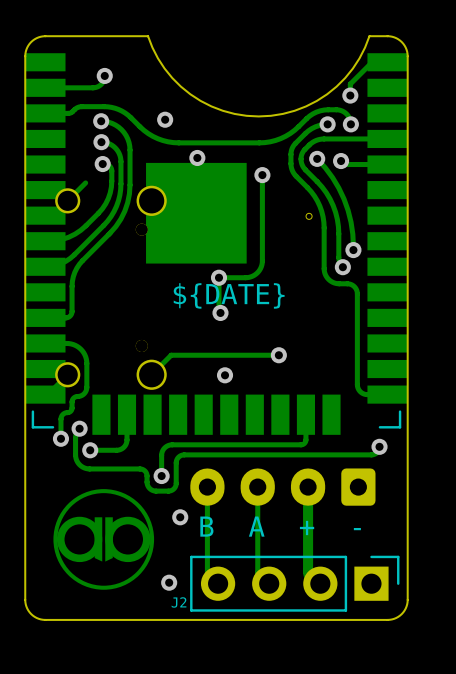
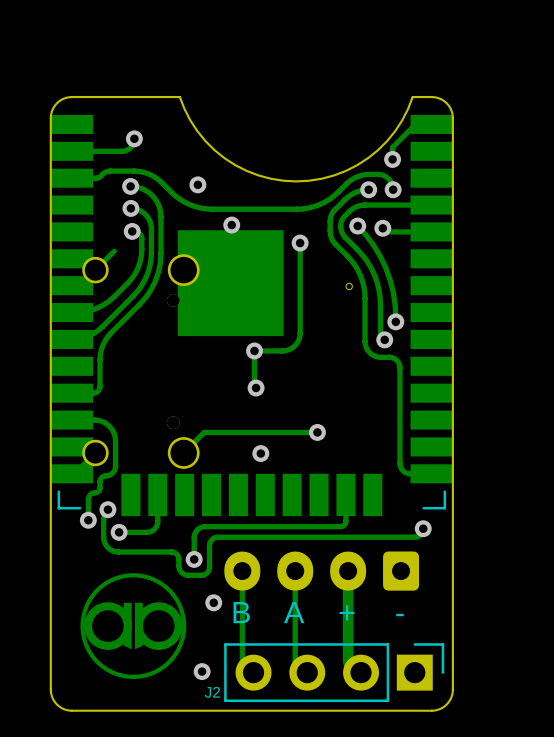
text: ${DATE} (229, 295) -> none

